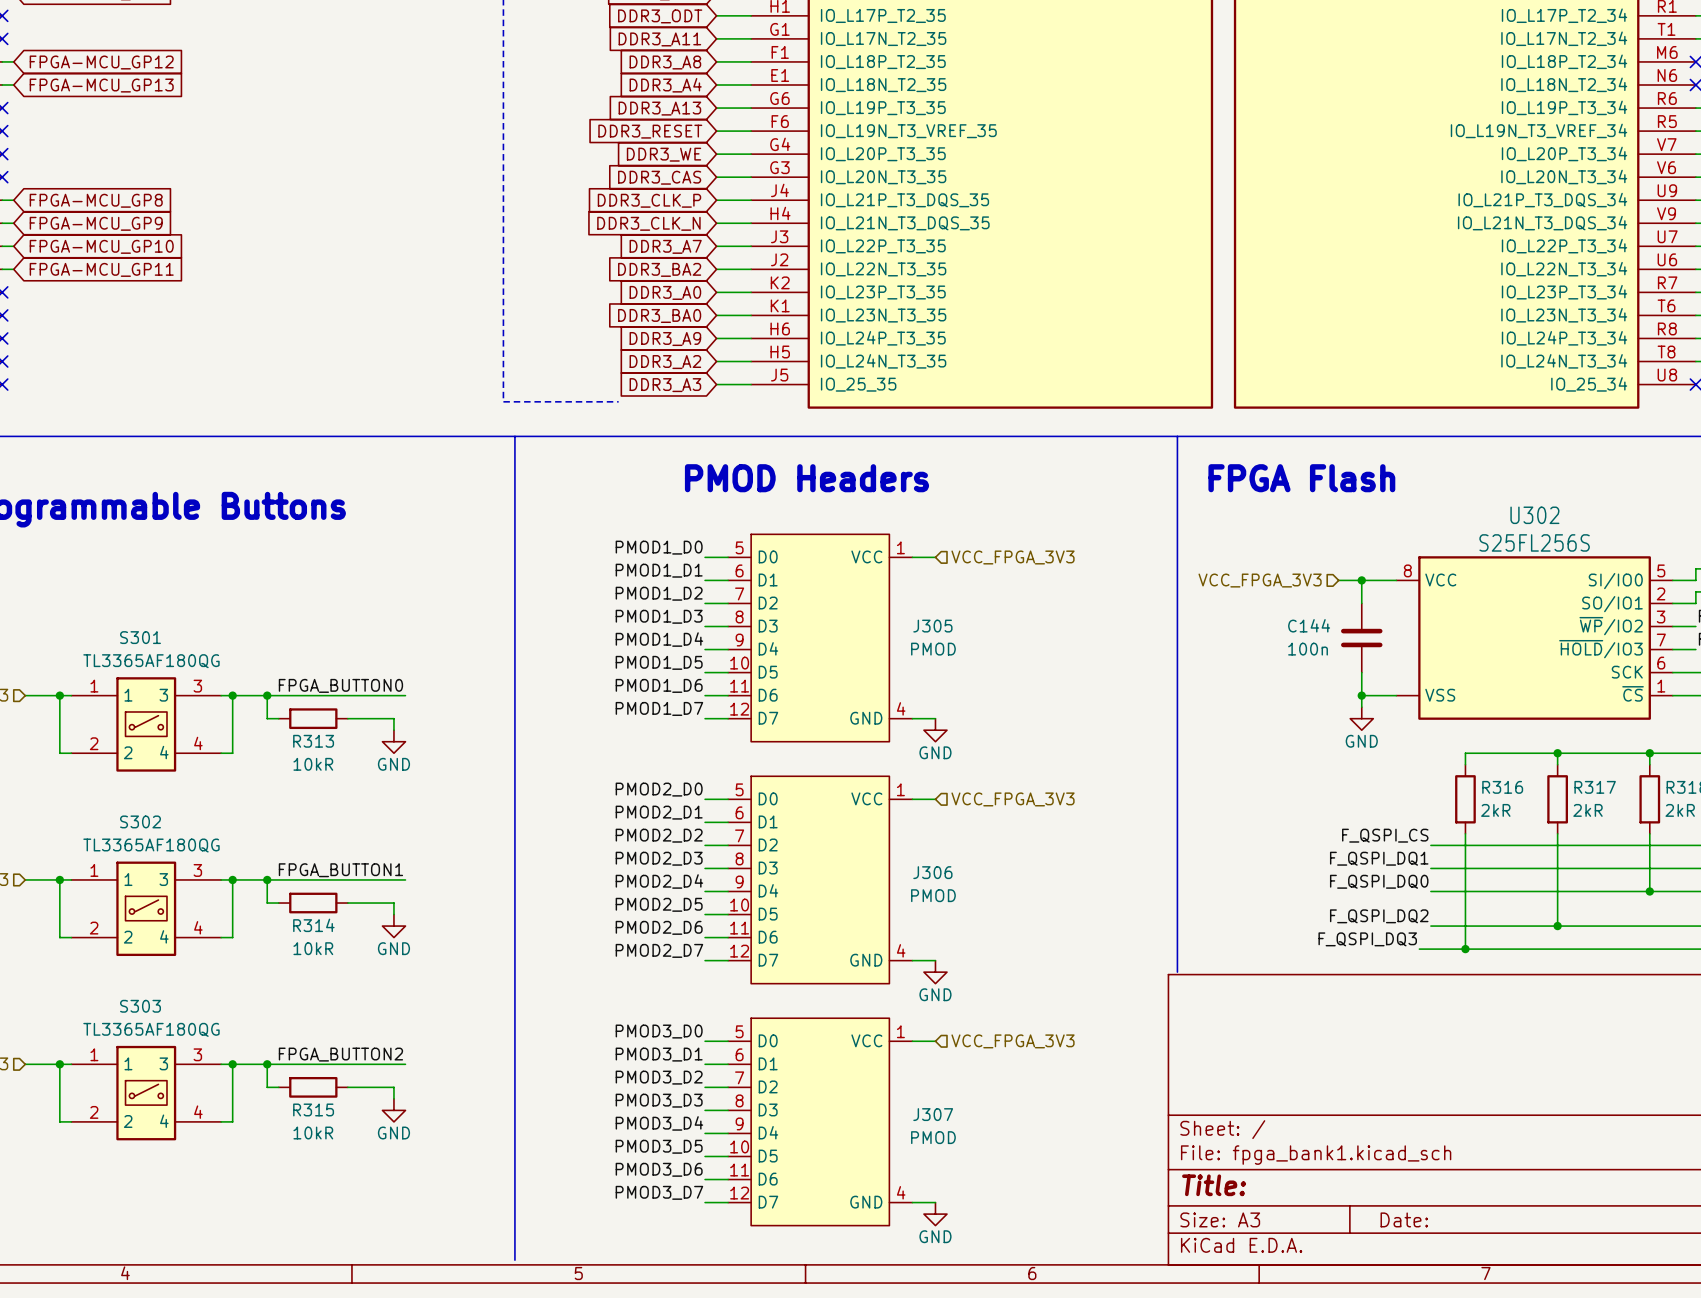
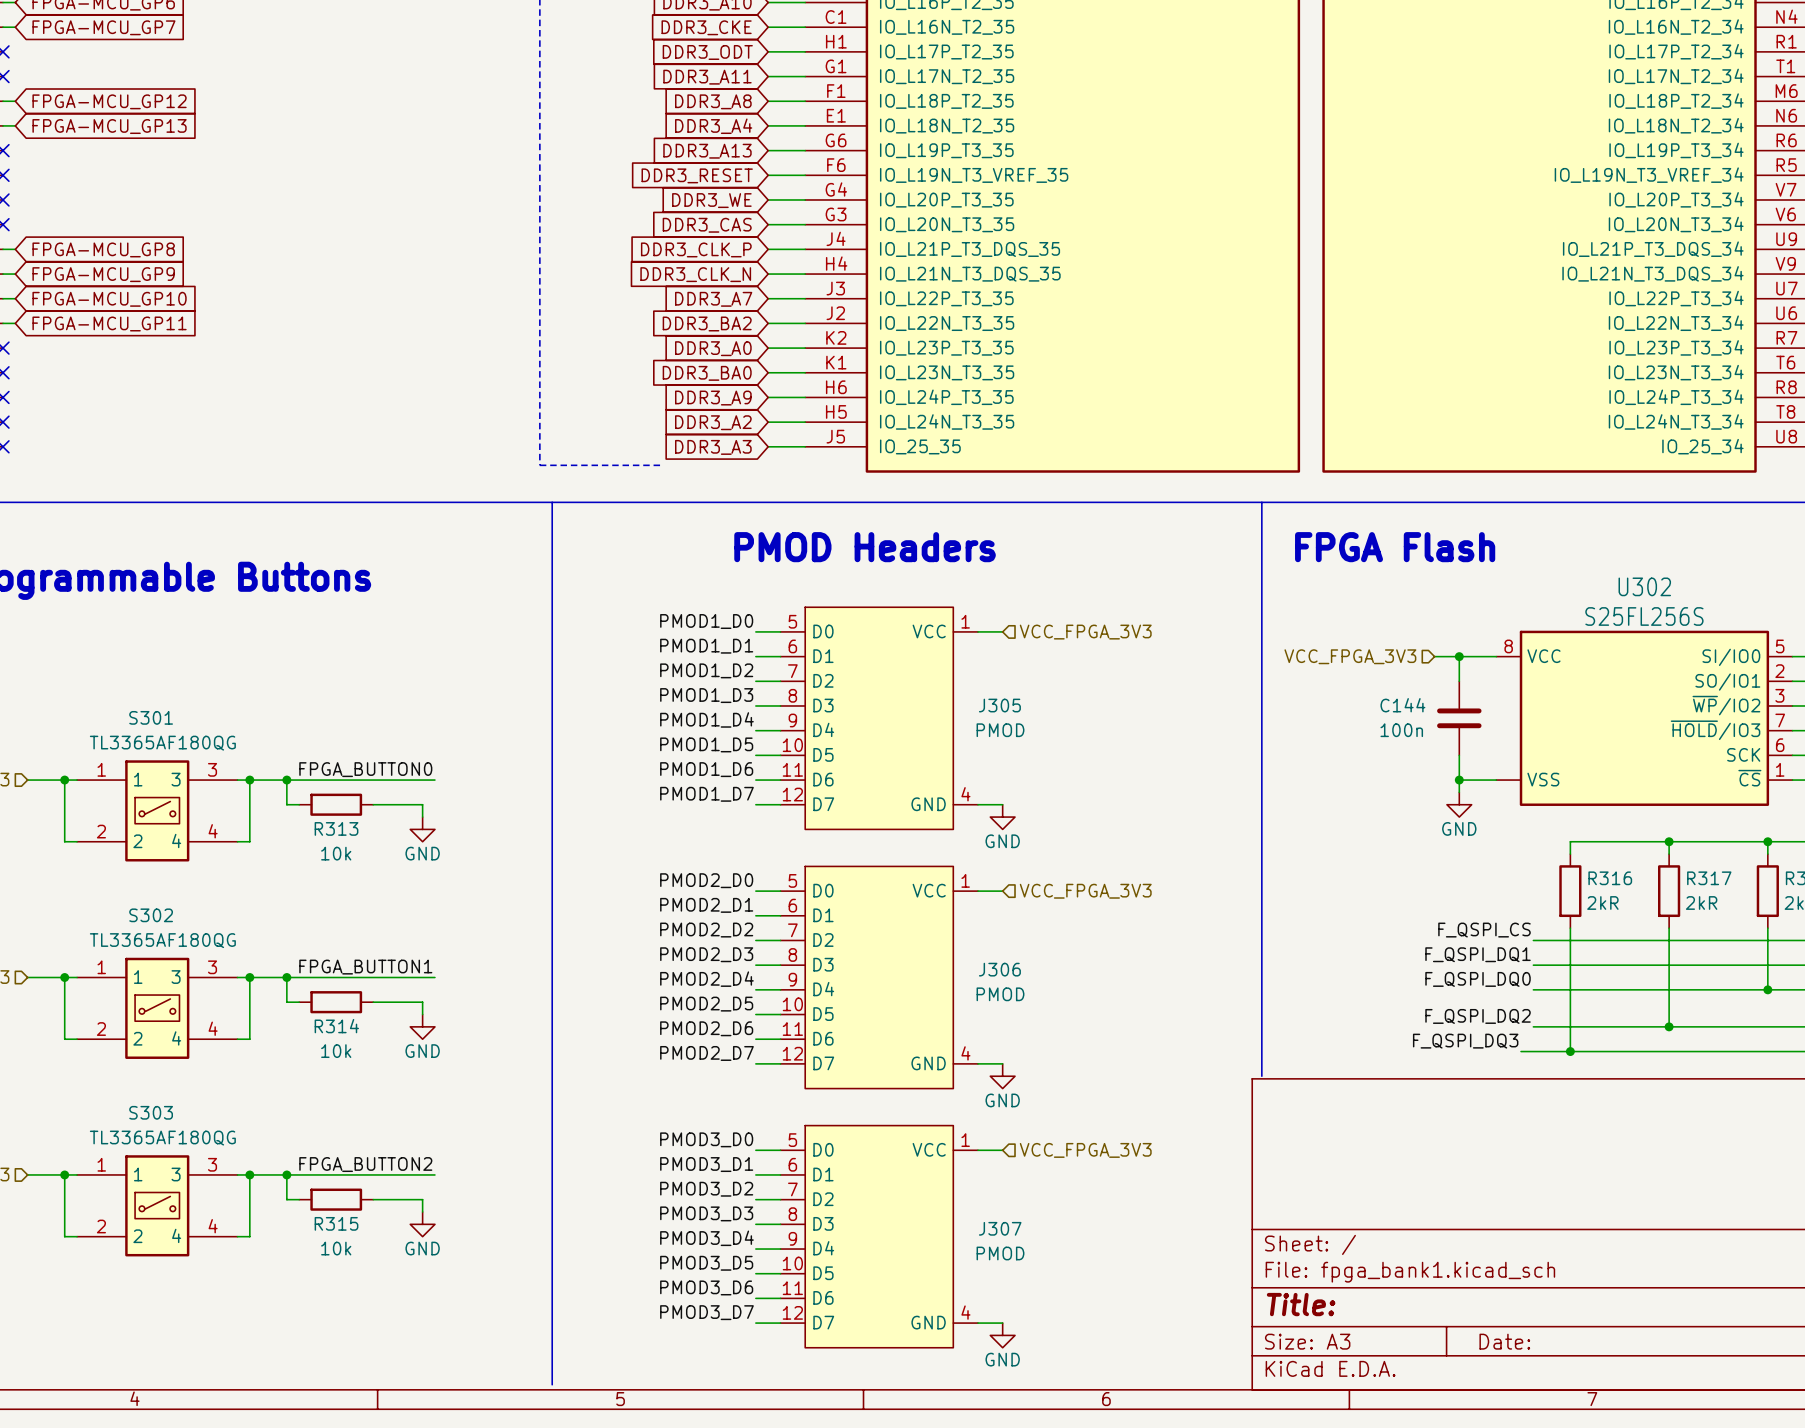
R313 value: 10kR (313, 764) -> 10k (336, 853)
R314 value: 10kR (313, 948) -> 10k (336, 1051)
R315 value: 10kR (313, 1133) -> 10k (336, 1248)

